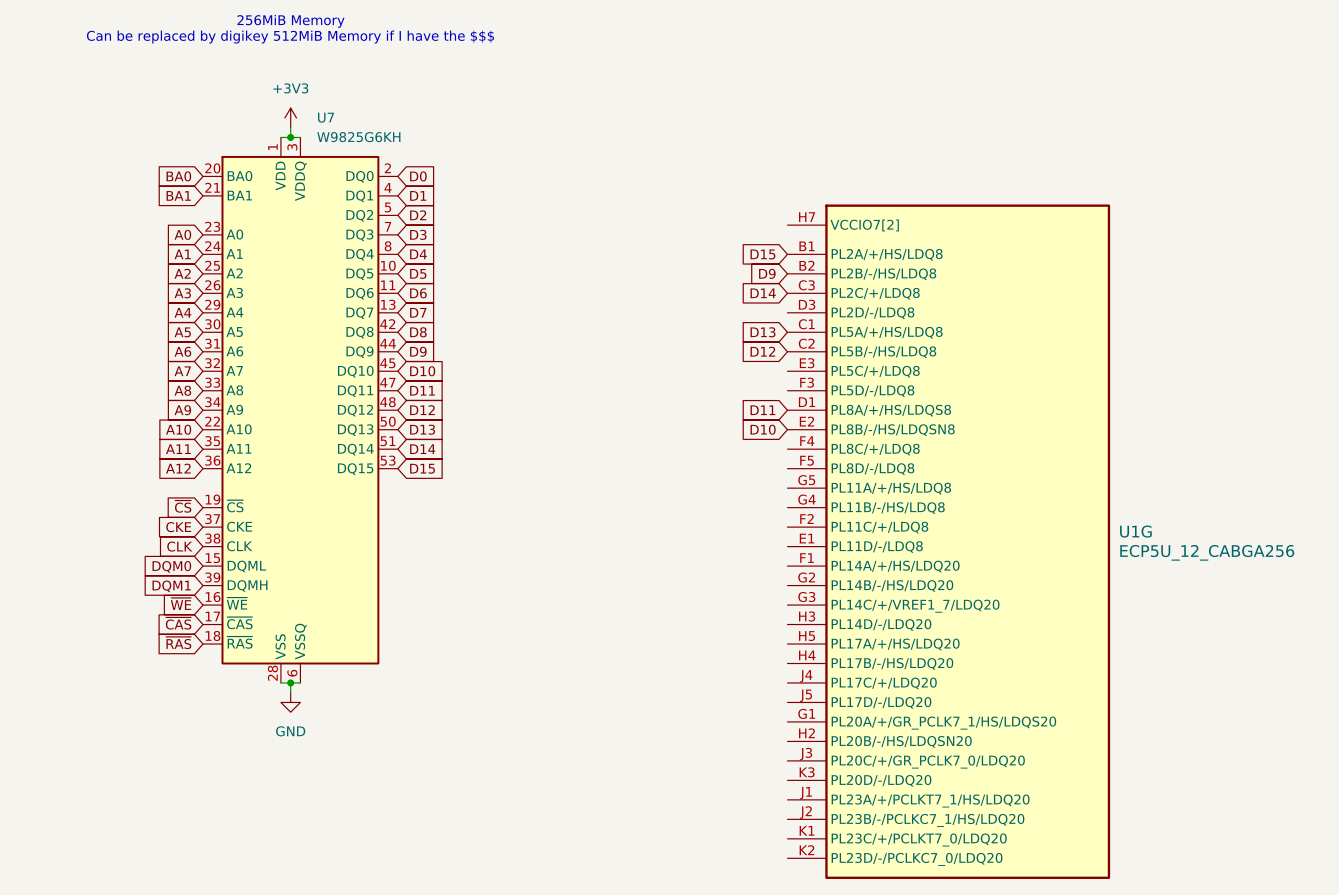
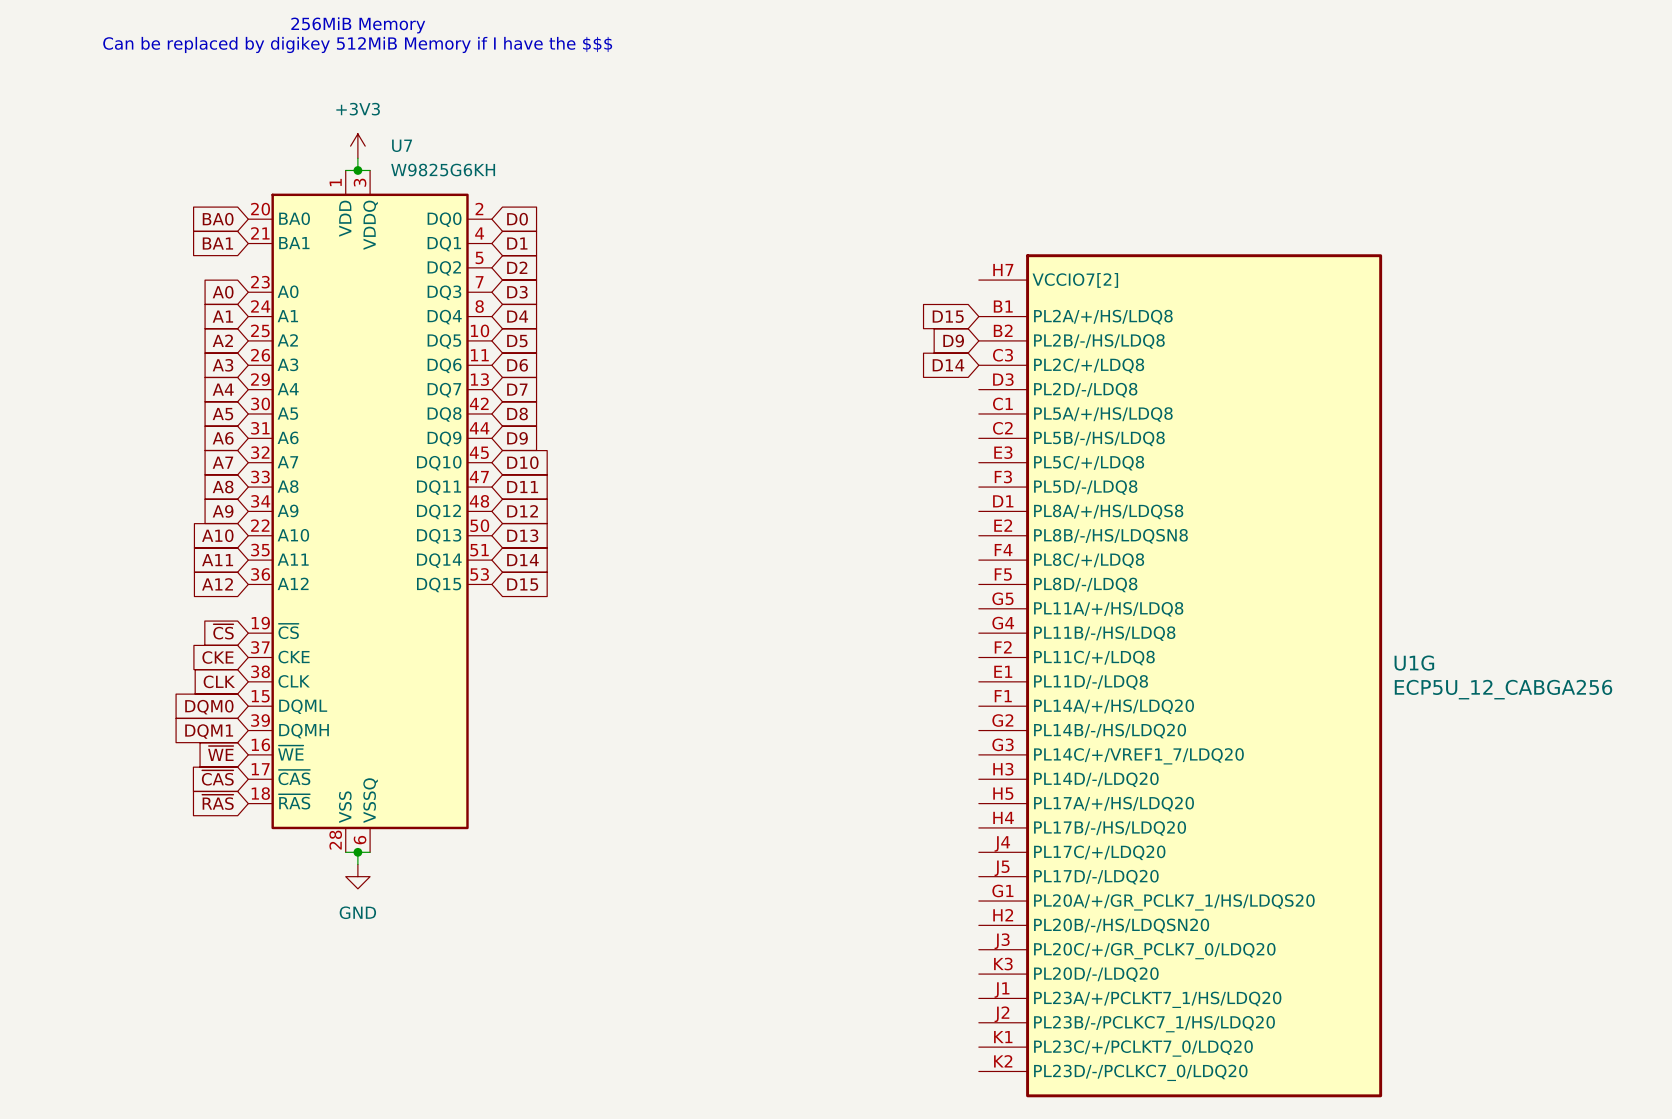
global label: D13 (763, 332) -> none
global label: D12 (762, 351) -> none
global label: D11 (762, 410) -> none
global label: D10 (763, 429) -> none

